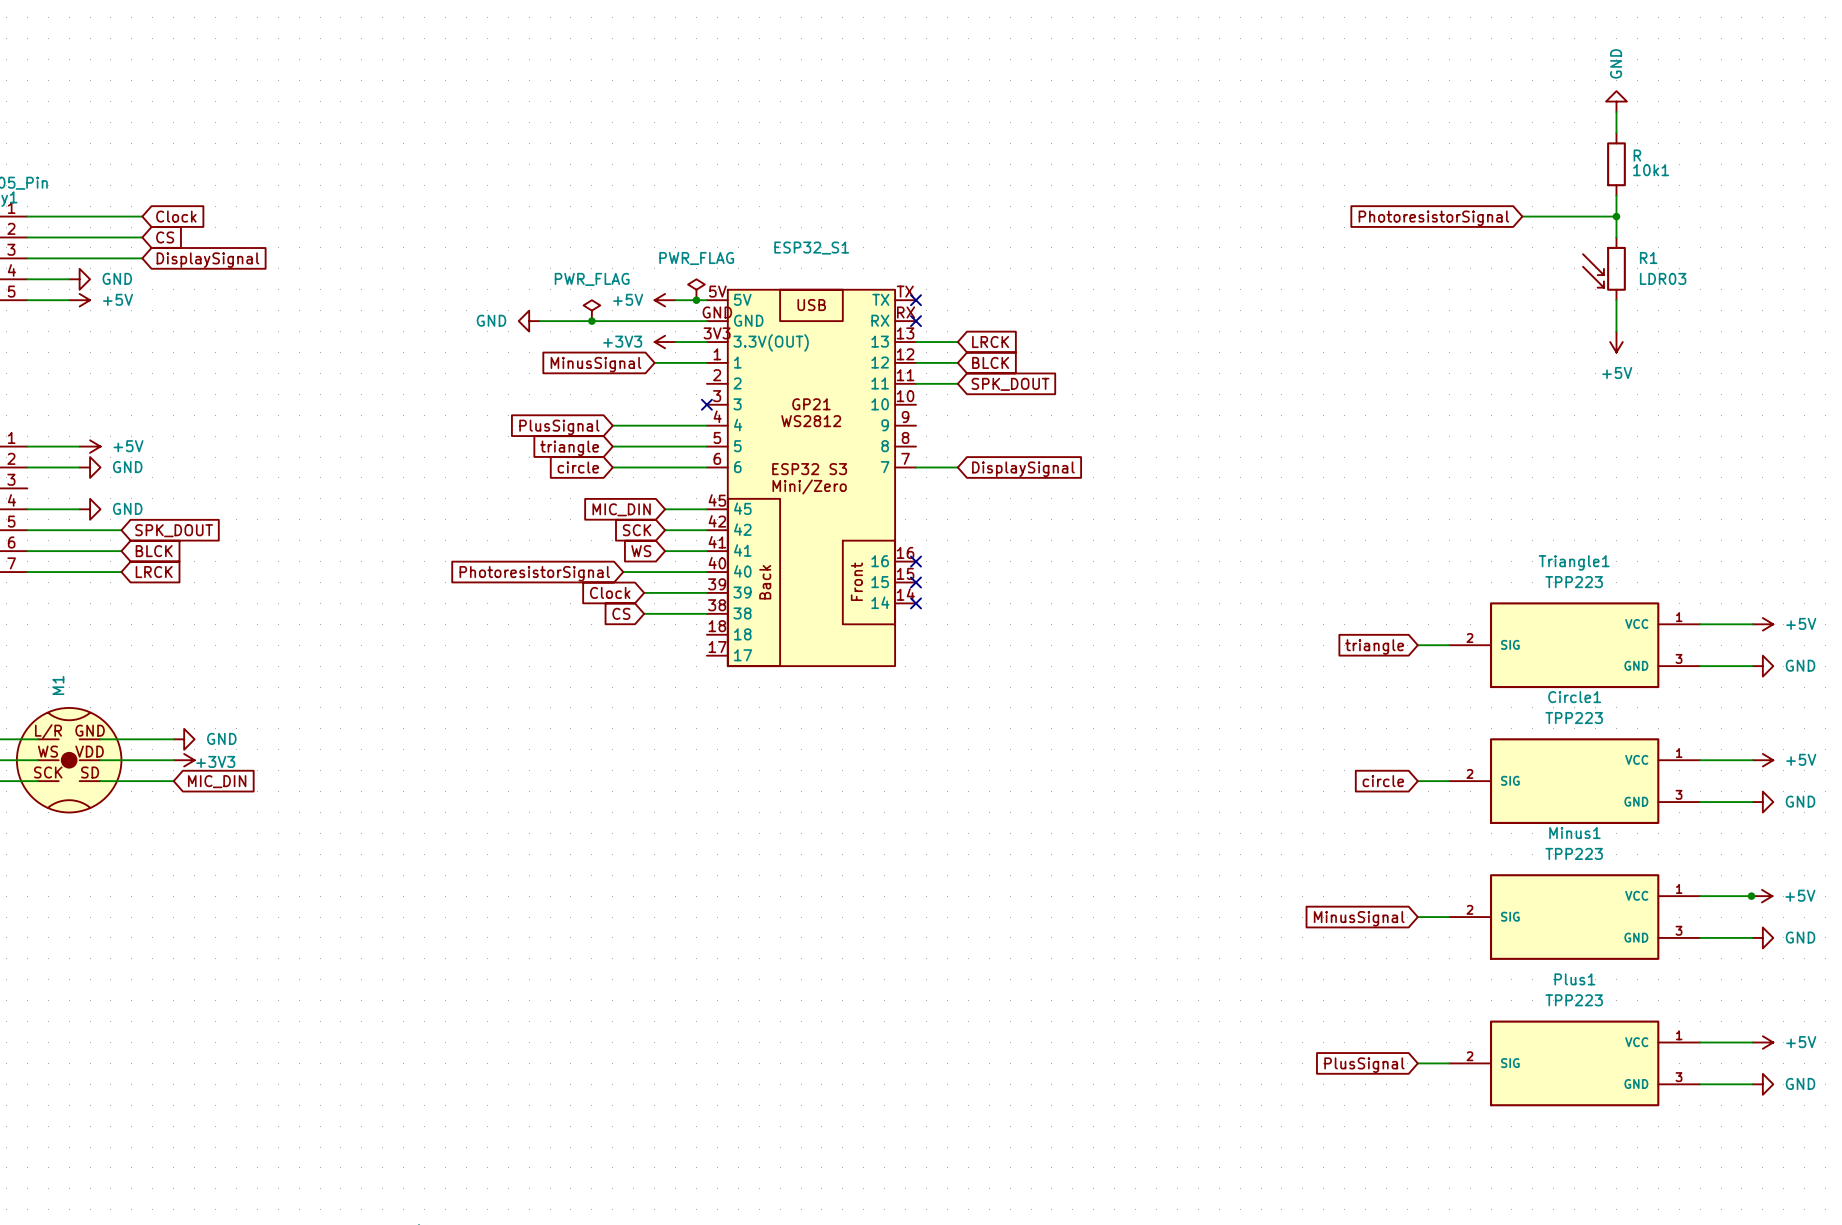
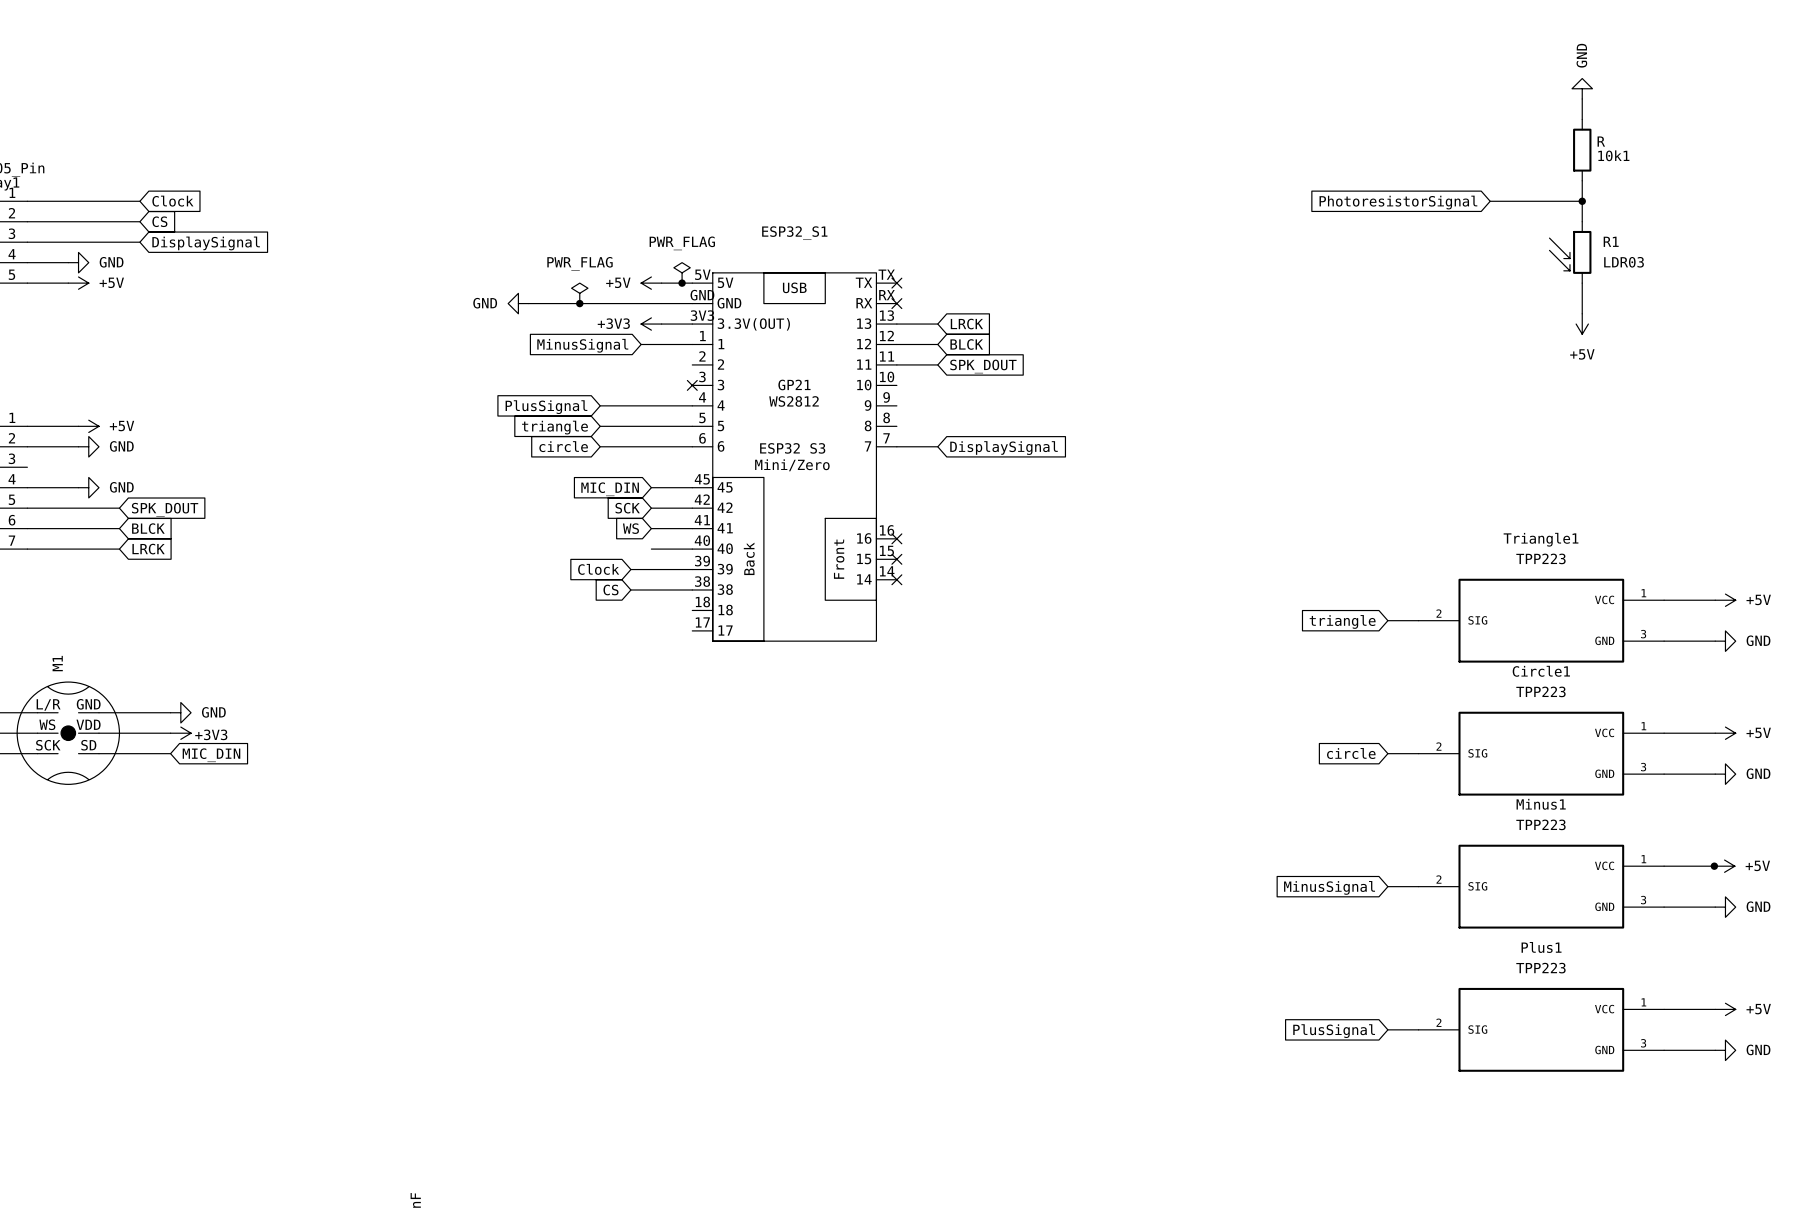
wire: (623, 572) (665, 572) -> none
global label: PhotoresistorSignal (534, 573) -> none

